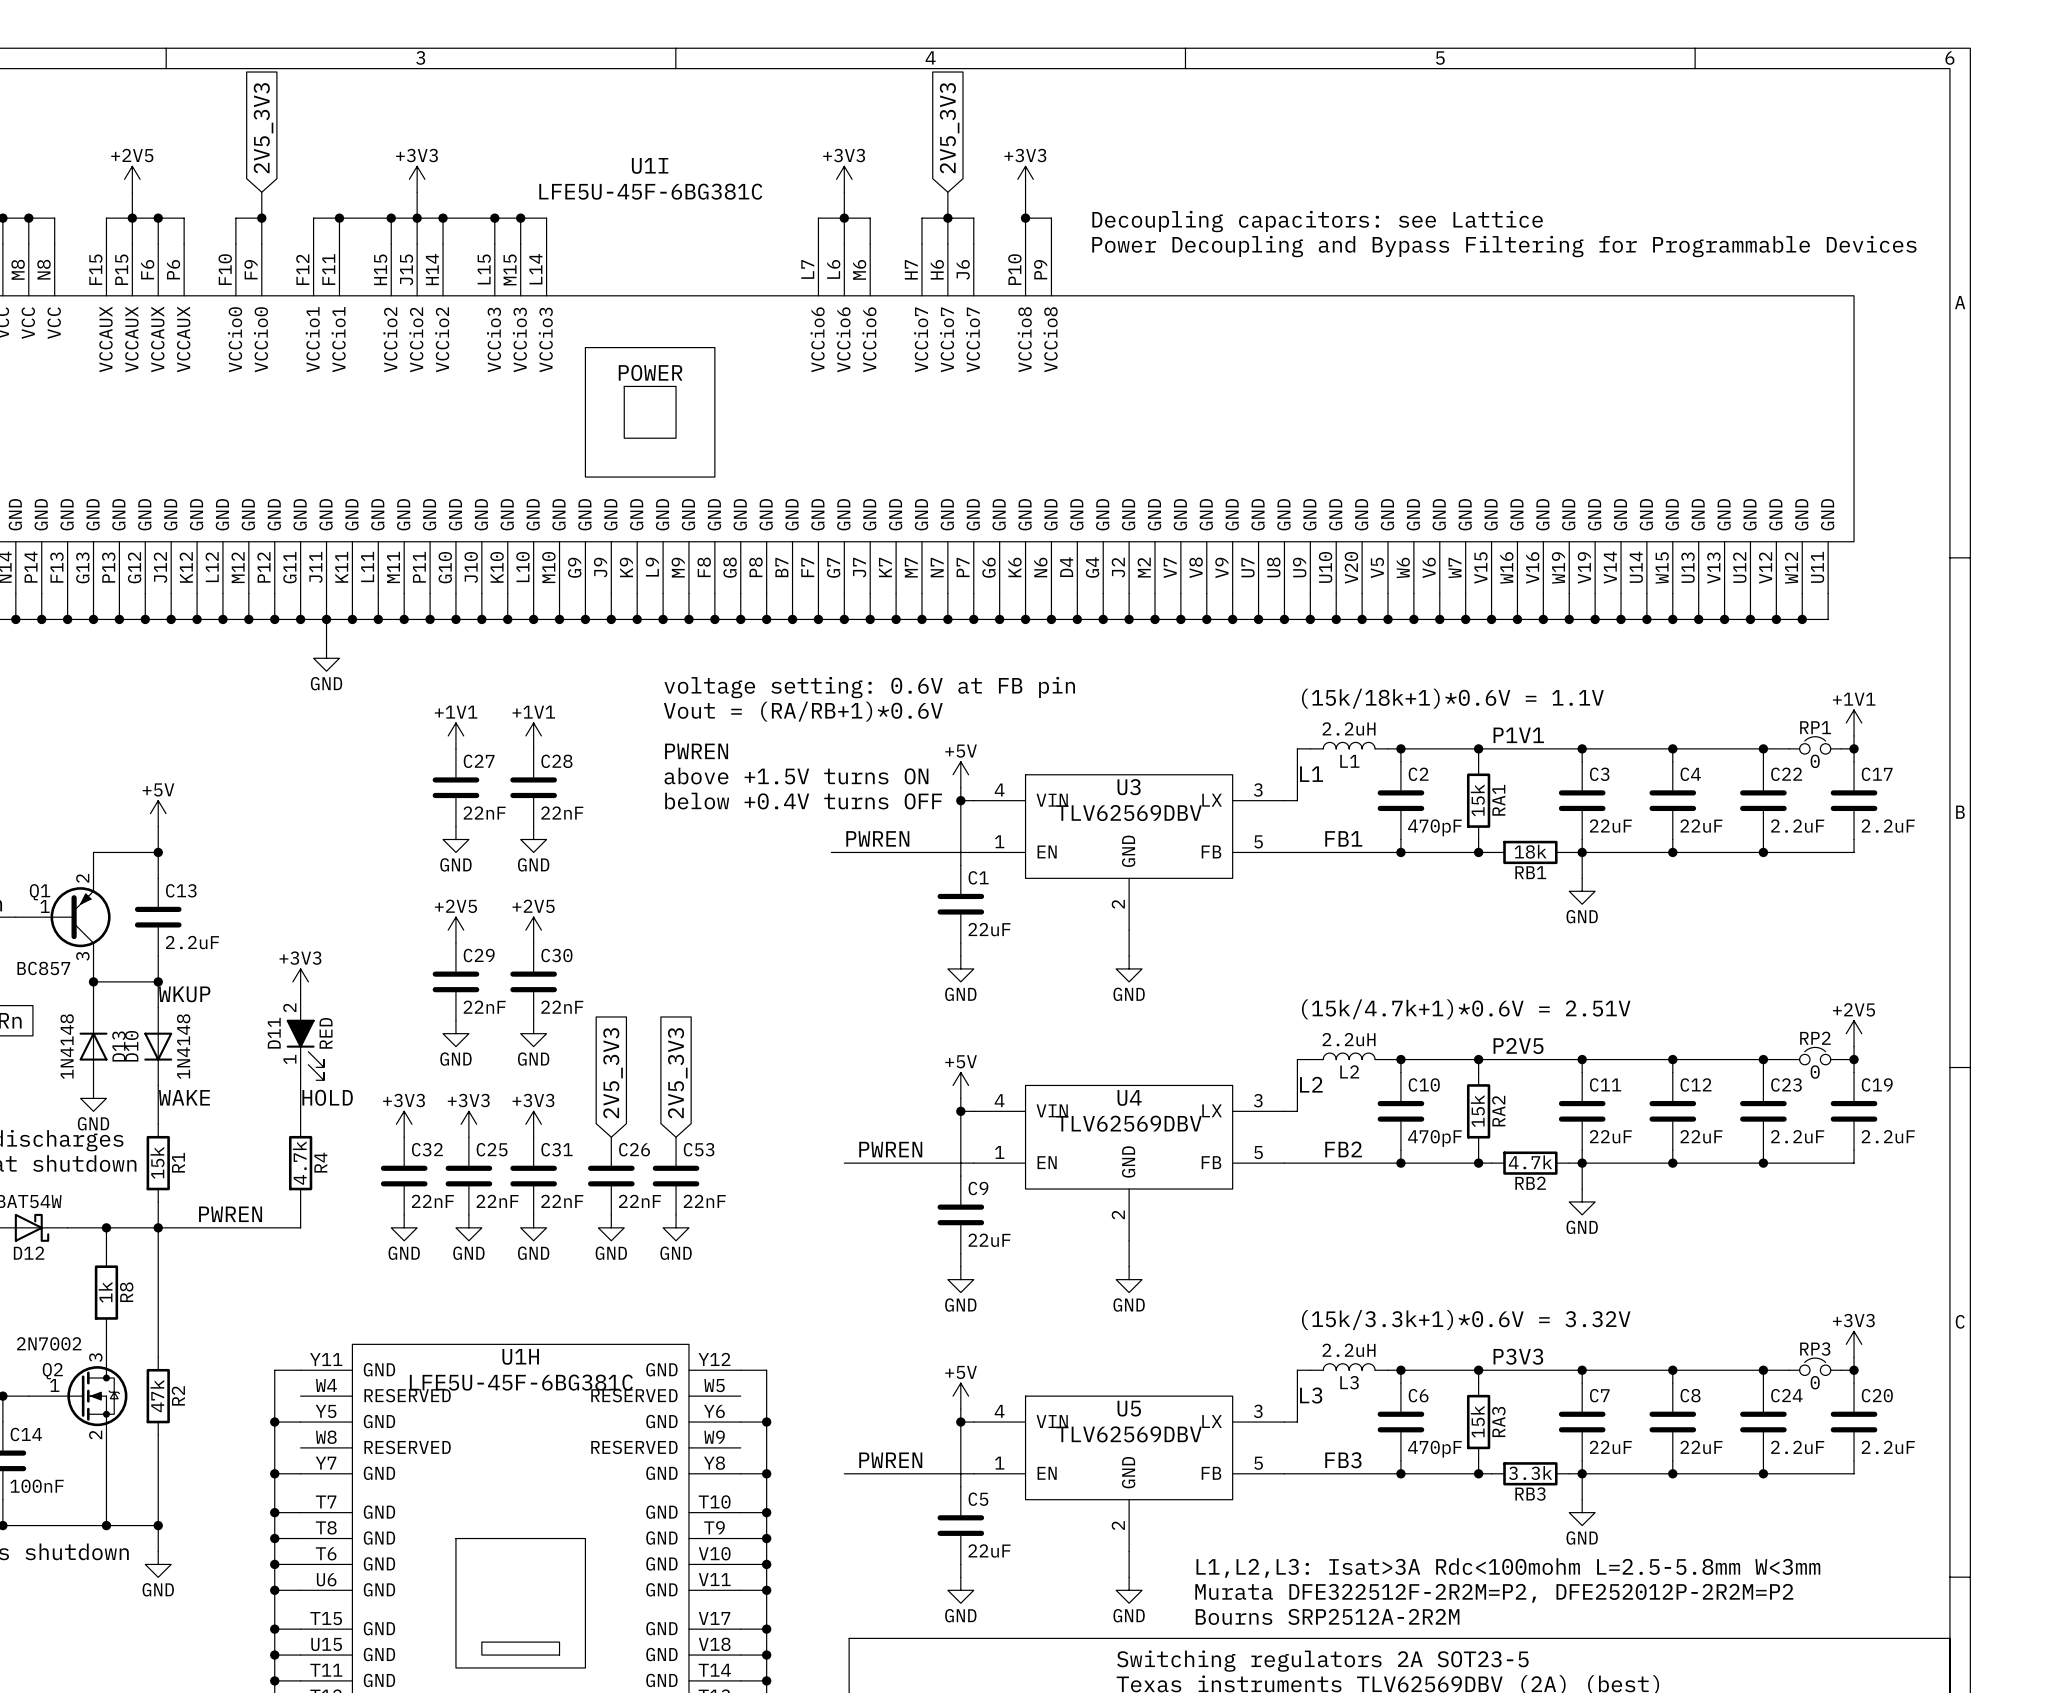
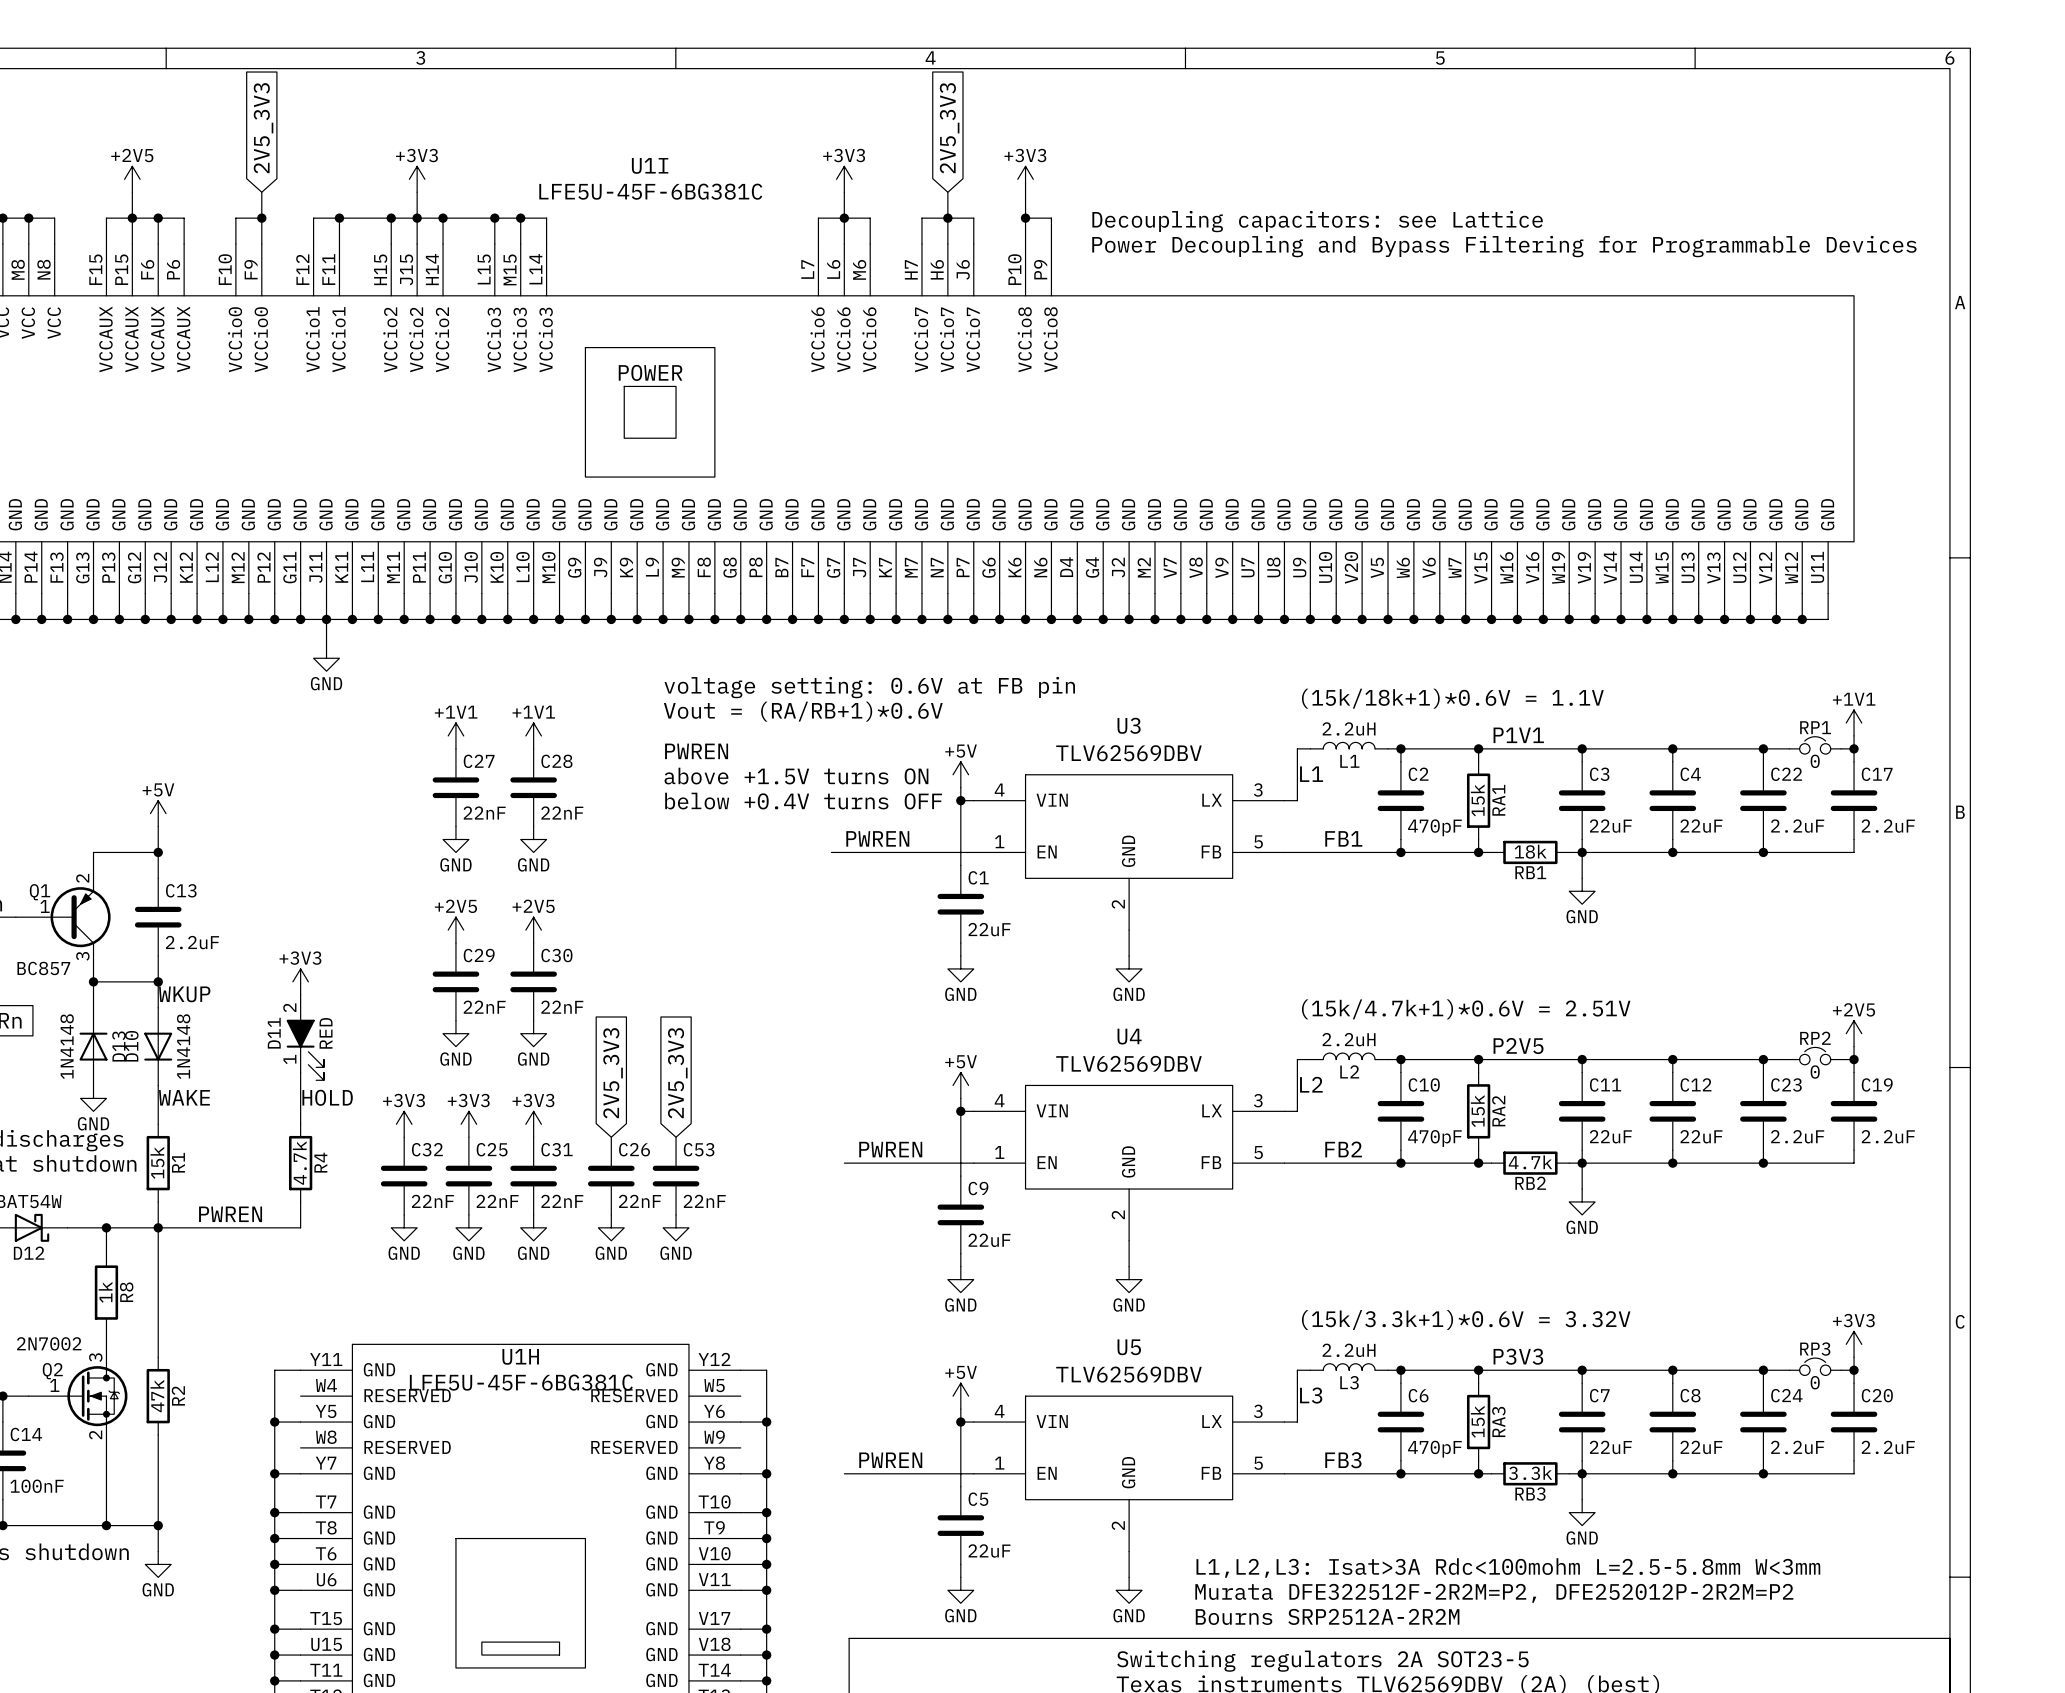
U3 name position: U3 (1129, 787) -> U3 (1129, 725)
U3 value position: TLV62569DBV (1128, 813) -> TLV62569DBV (1128, 753)
U4 name position: U4 (1129, 1097) -> U4 (1129, 1036)
U4 value position: TLV62569DBV (1128, 1123) -> TLV62569DBV (1128, 1063)
U5 name position: U5 (1129, 1408) -> U5 (1129, 1347)
U5 value position: TLV62569DBV (1128, 1434) -> TLV62569DBV (1128, 1374)

